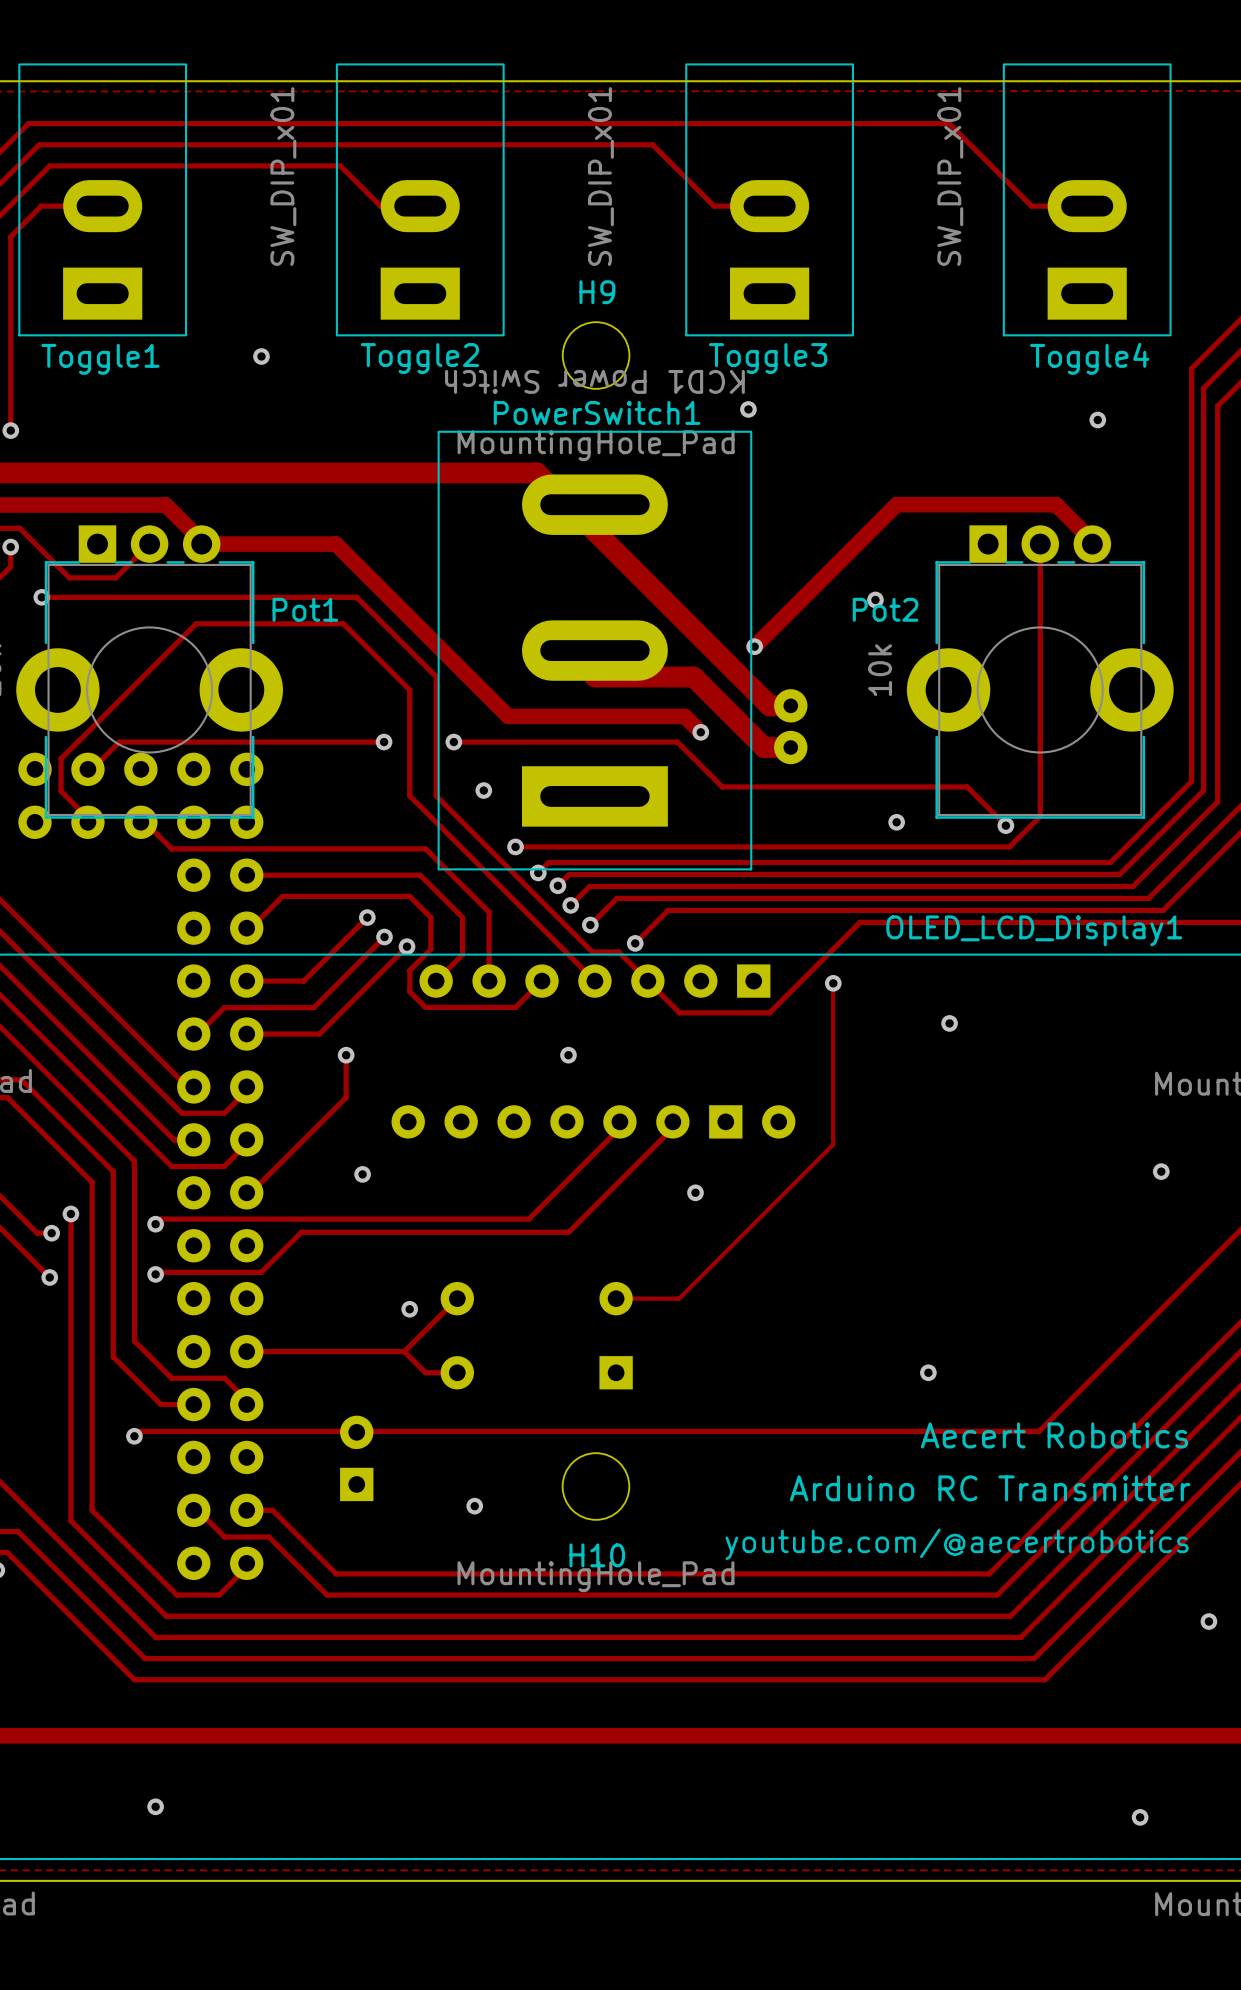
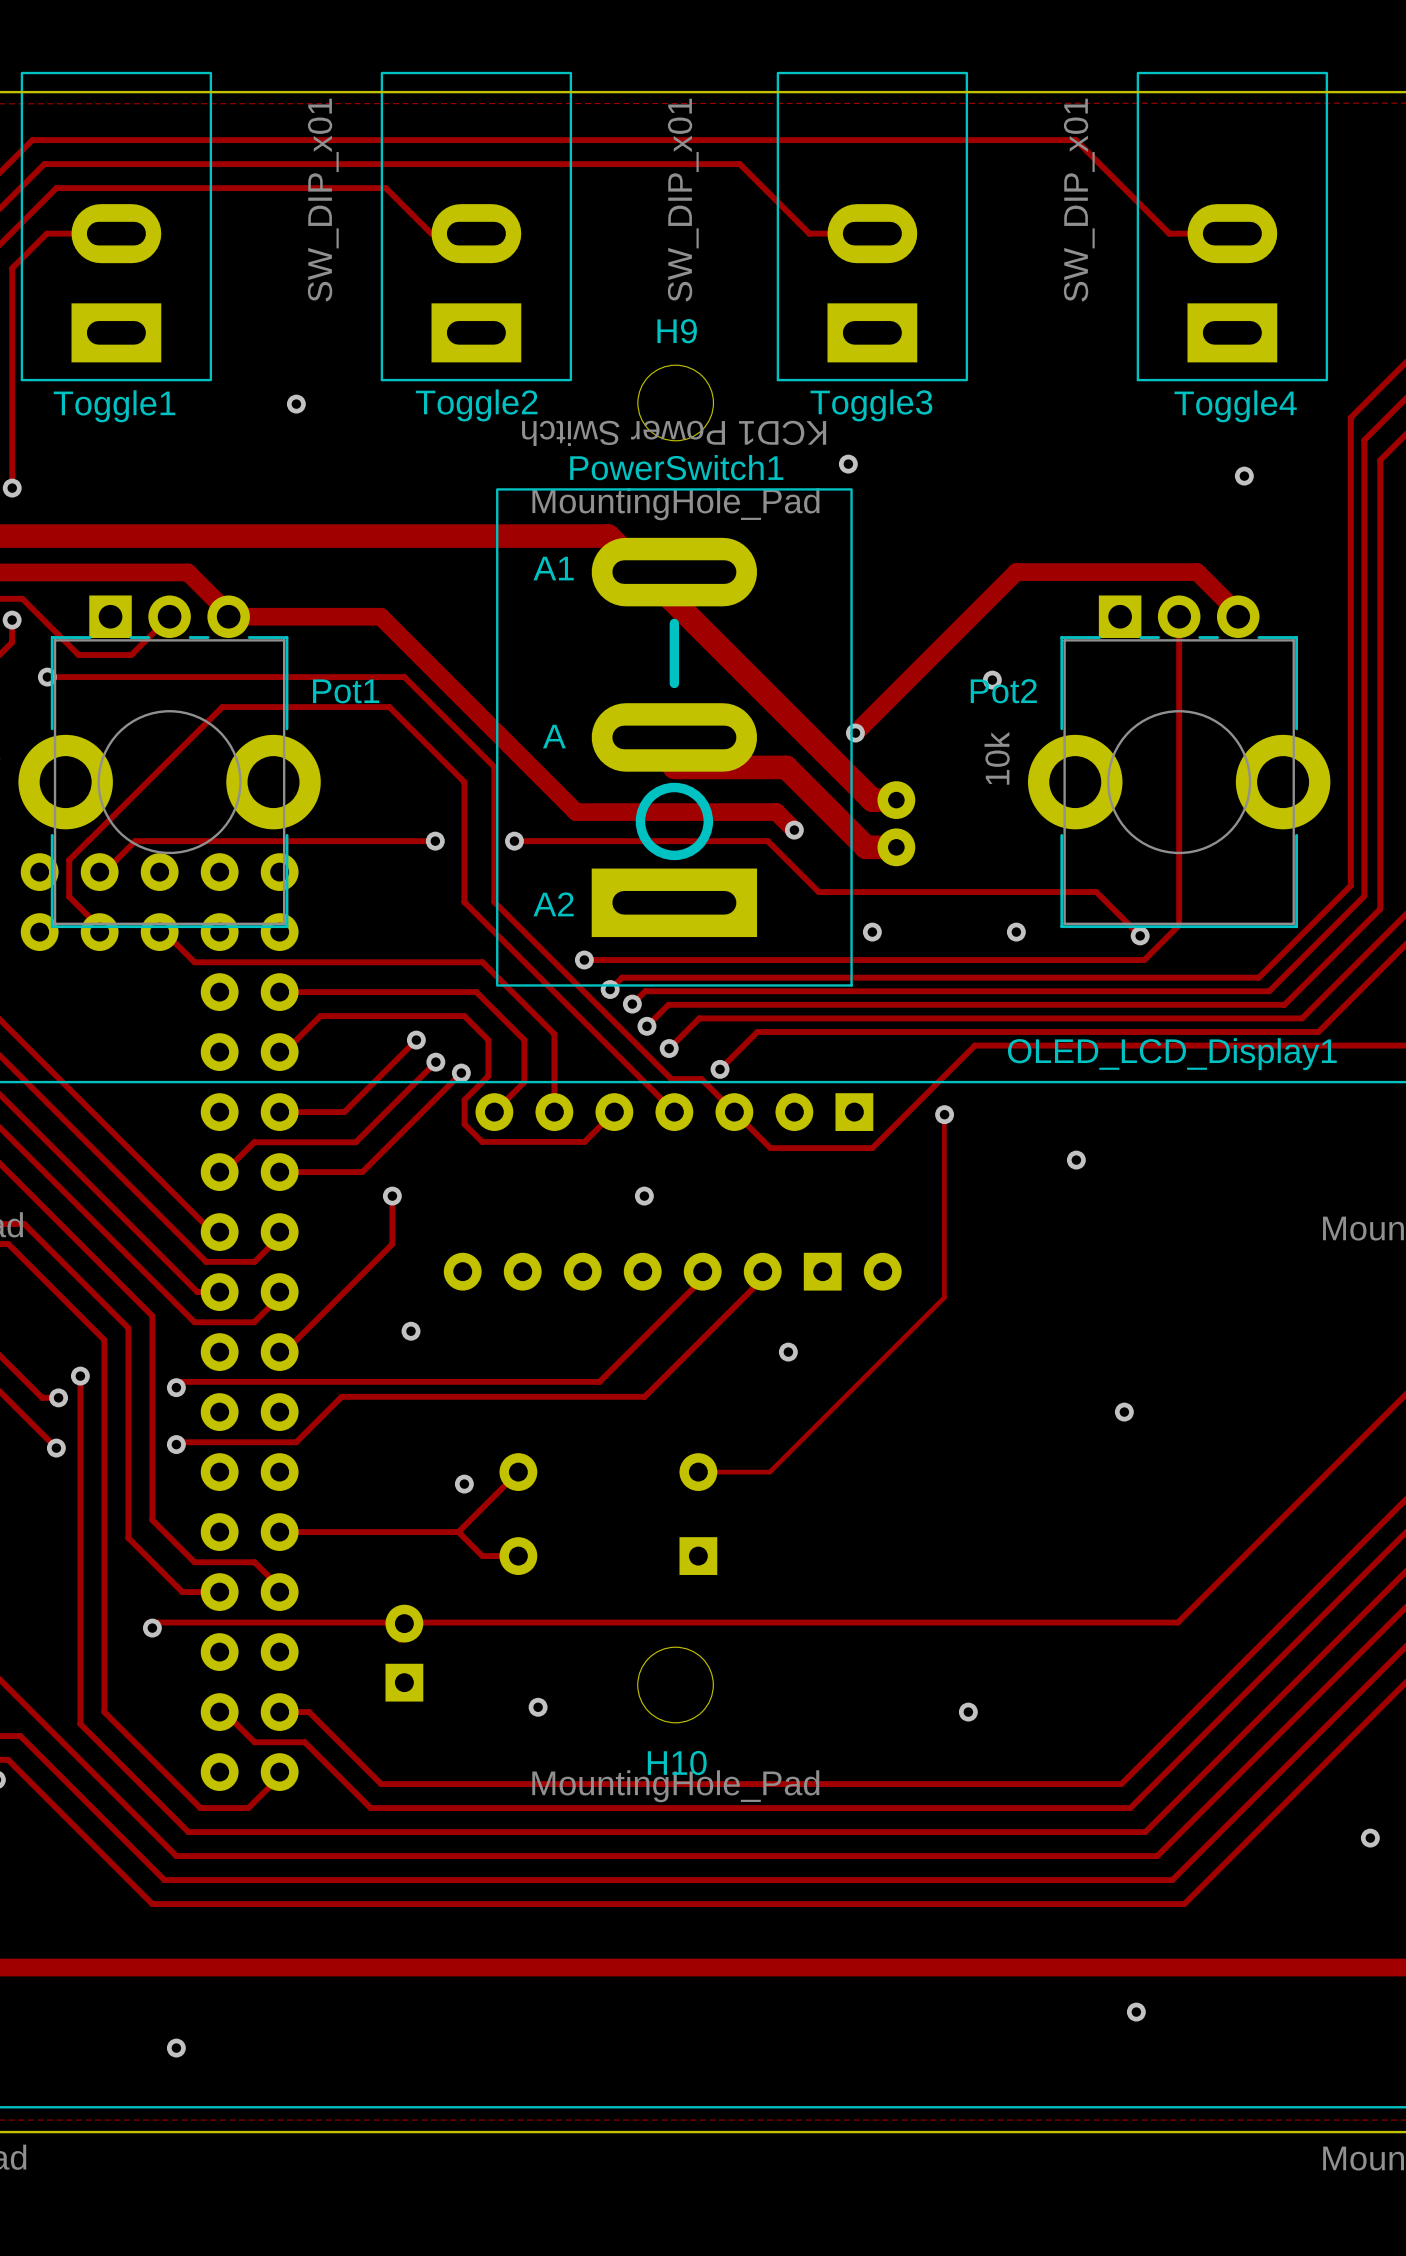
PowerSwitch1 footprint: [437, 430, 753, 871] -> [496, 488, 853, 987]
via: (483, 790) -> none
via: none -> (872, 932)
via: (1161, 1171) -> none
via: none -> (1124, 1412)
via: (928, 1372) -> none
text: Aecert Robotics (1054, 1435) -> none
text: Arduino RC Transmitter (990, 1488) -> none
via: none -> (968, 1712)
text: youtube.com/@aecertrobotics (957, 1544) -> none
via: none -> (1136, 2012)
via: (1140, 1817) -> none

